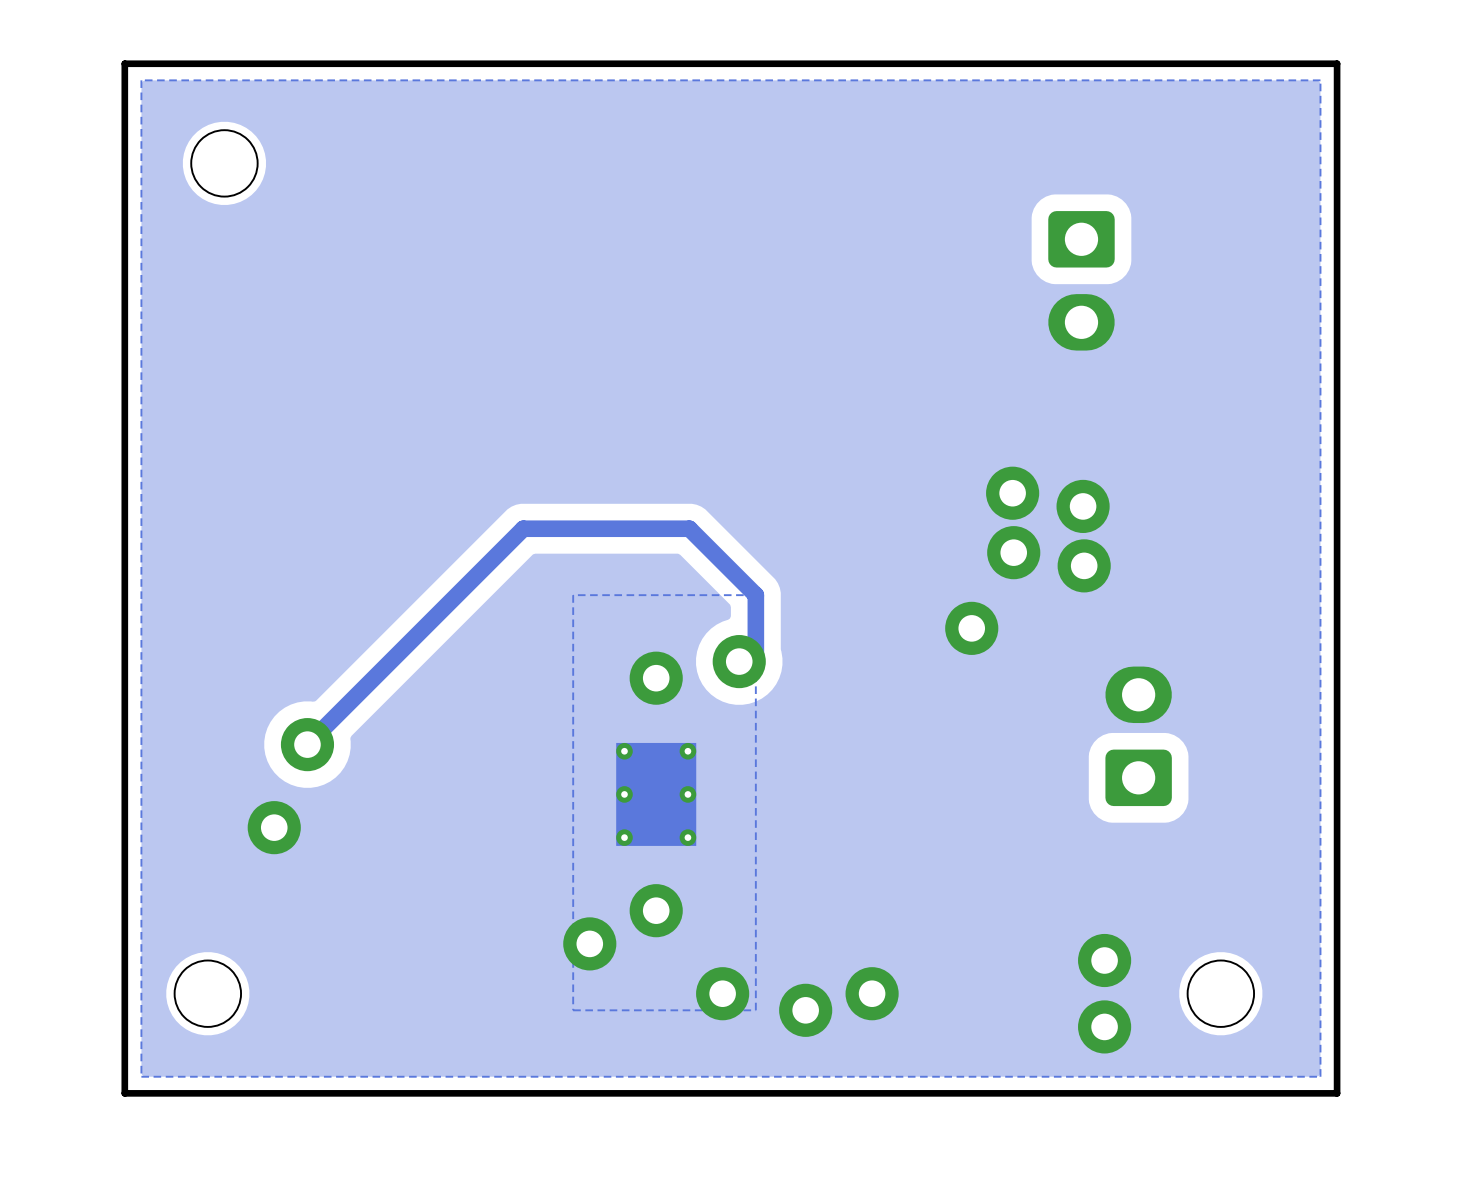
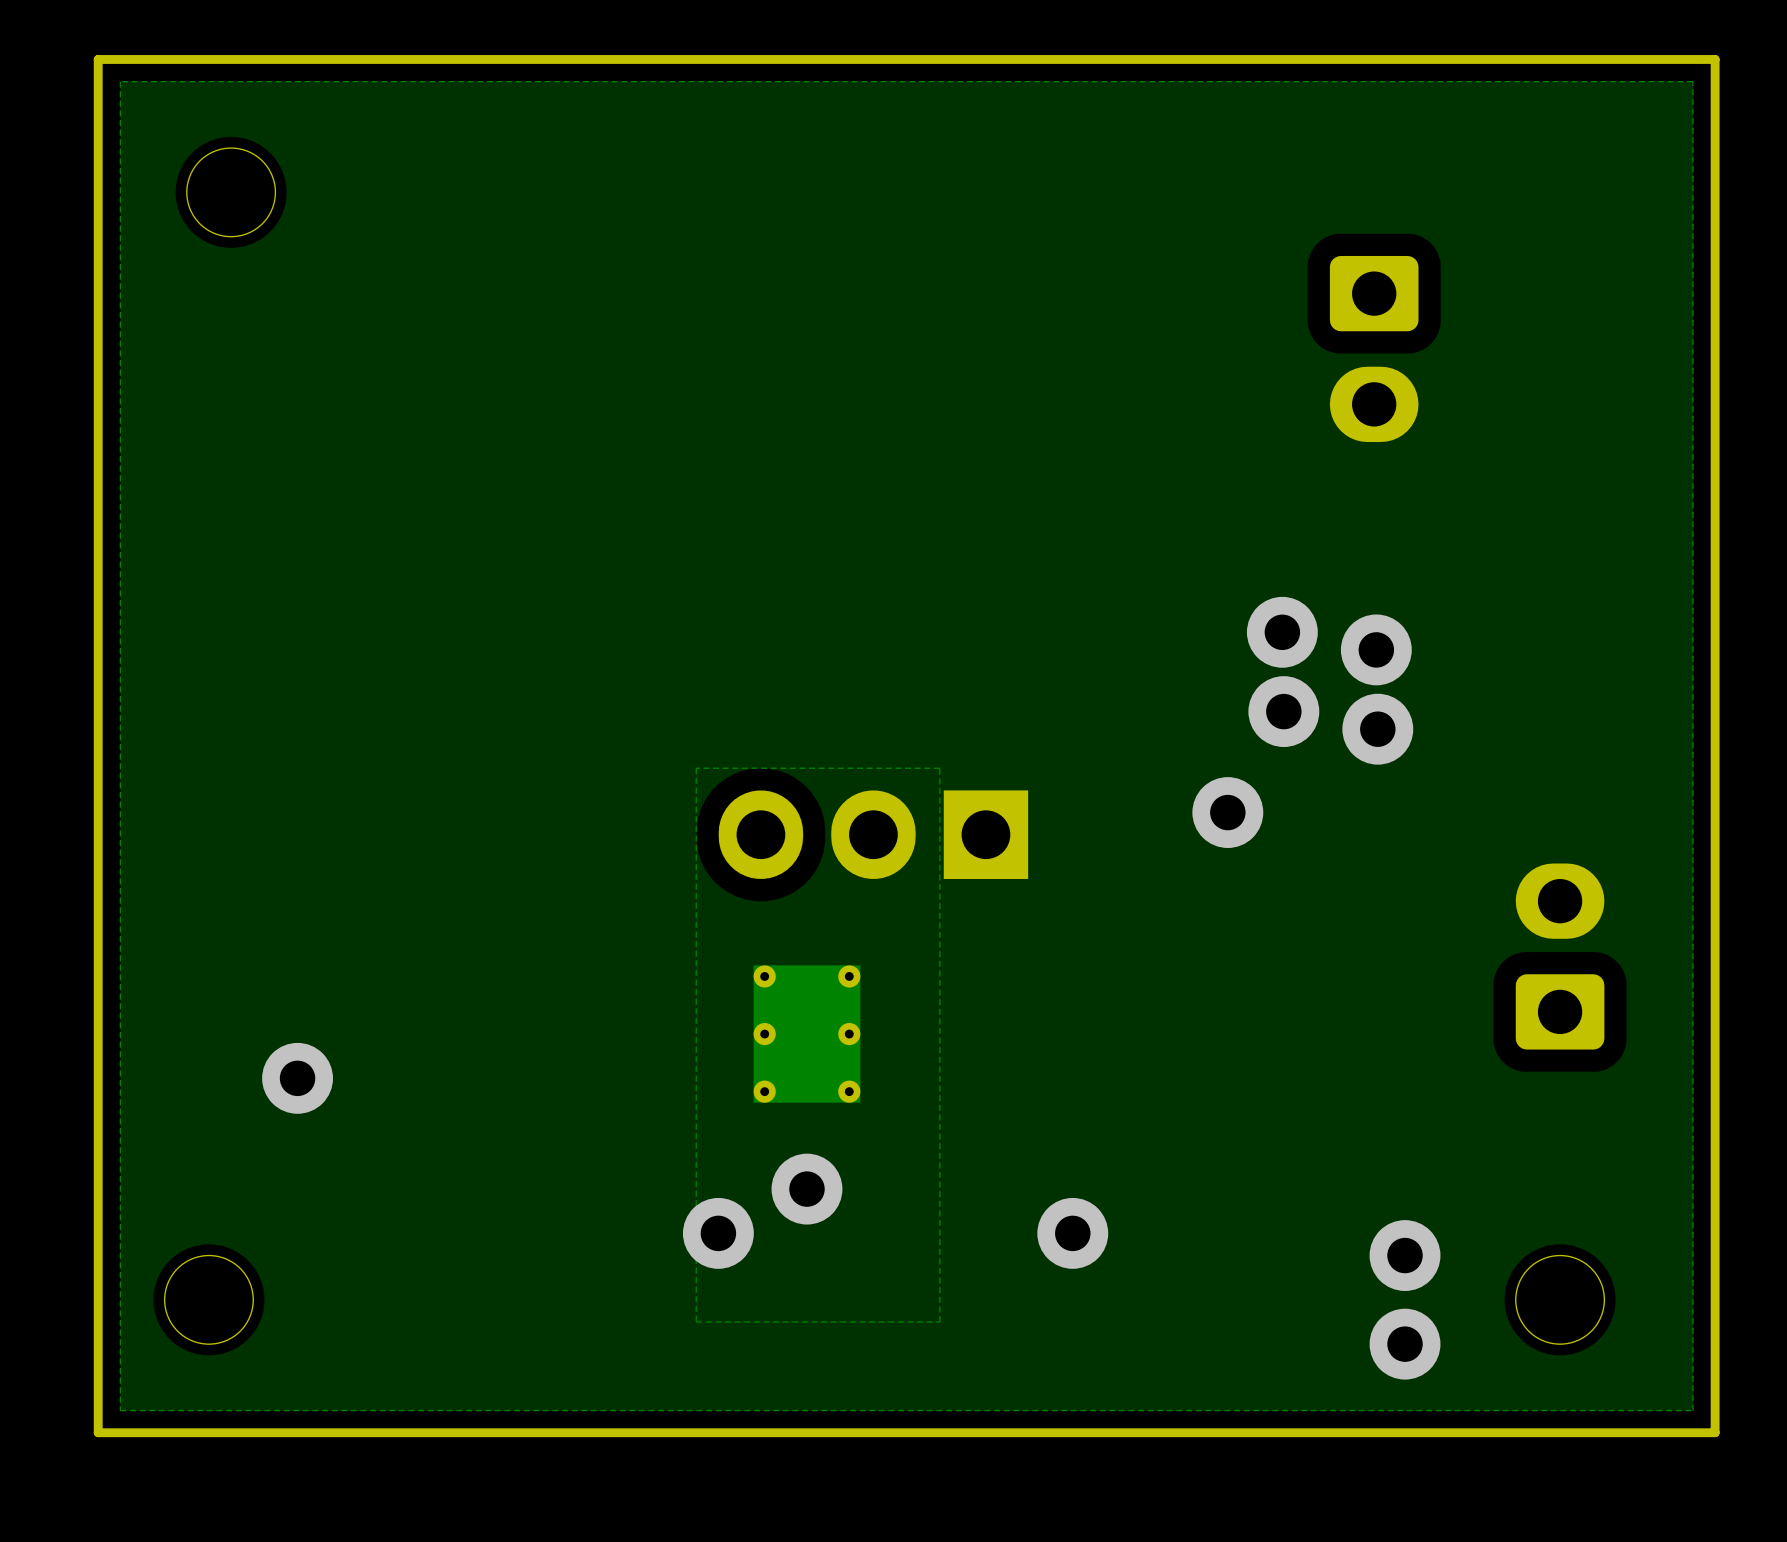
part: none -> (873, 834)
via: (739, 661) -> none
track: (755, 661) (755, 595) (689, 528) (523, 528) (307, 744) -> none
via: (656, 678) -> none
part position: (1138, 736) -> (1560, 956)
via: (307, 744) -> none
via: none -> (1072, 1233)
via: (722, 993) -> none
via: (872, 993) -> none
via: (805, 1010) -> none

